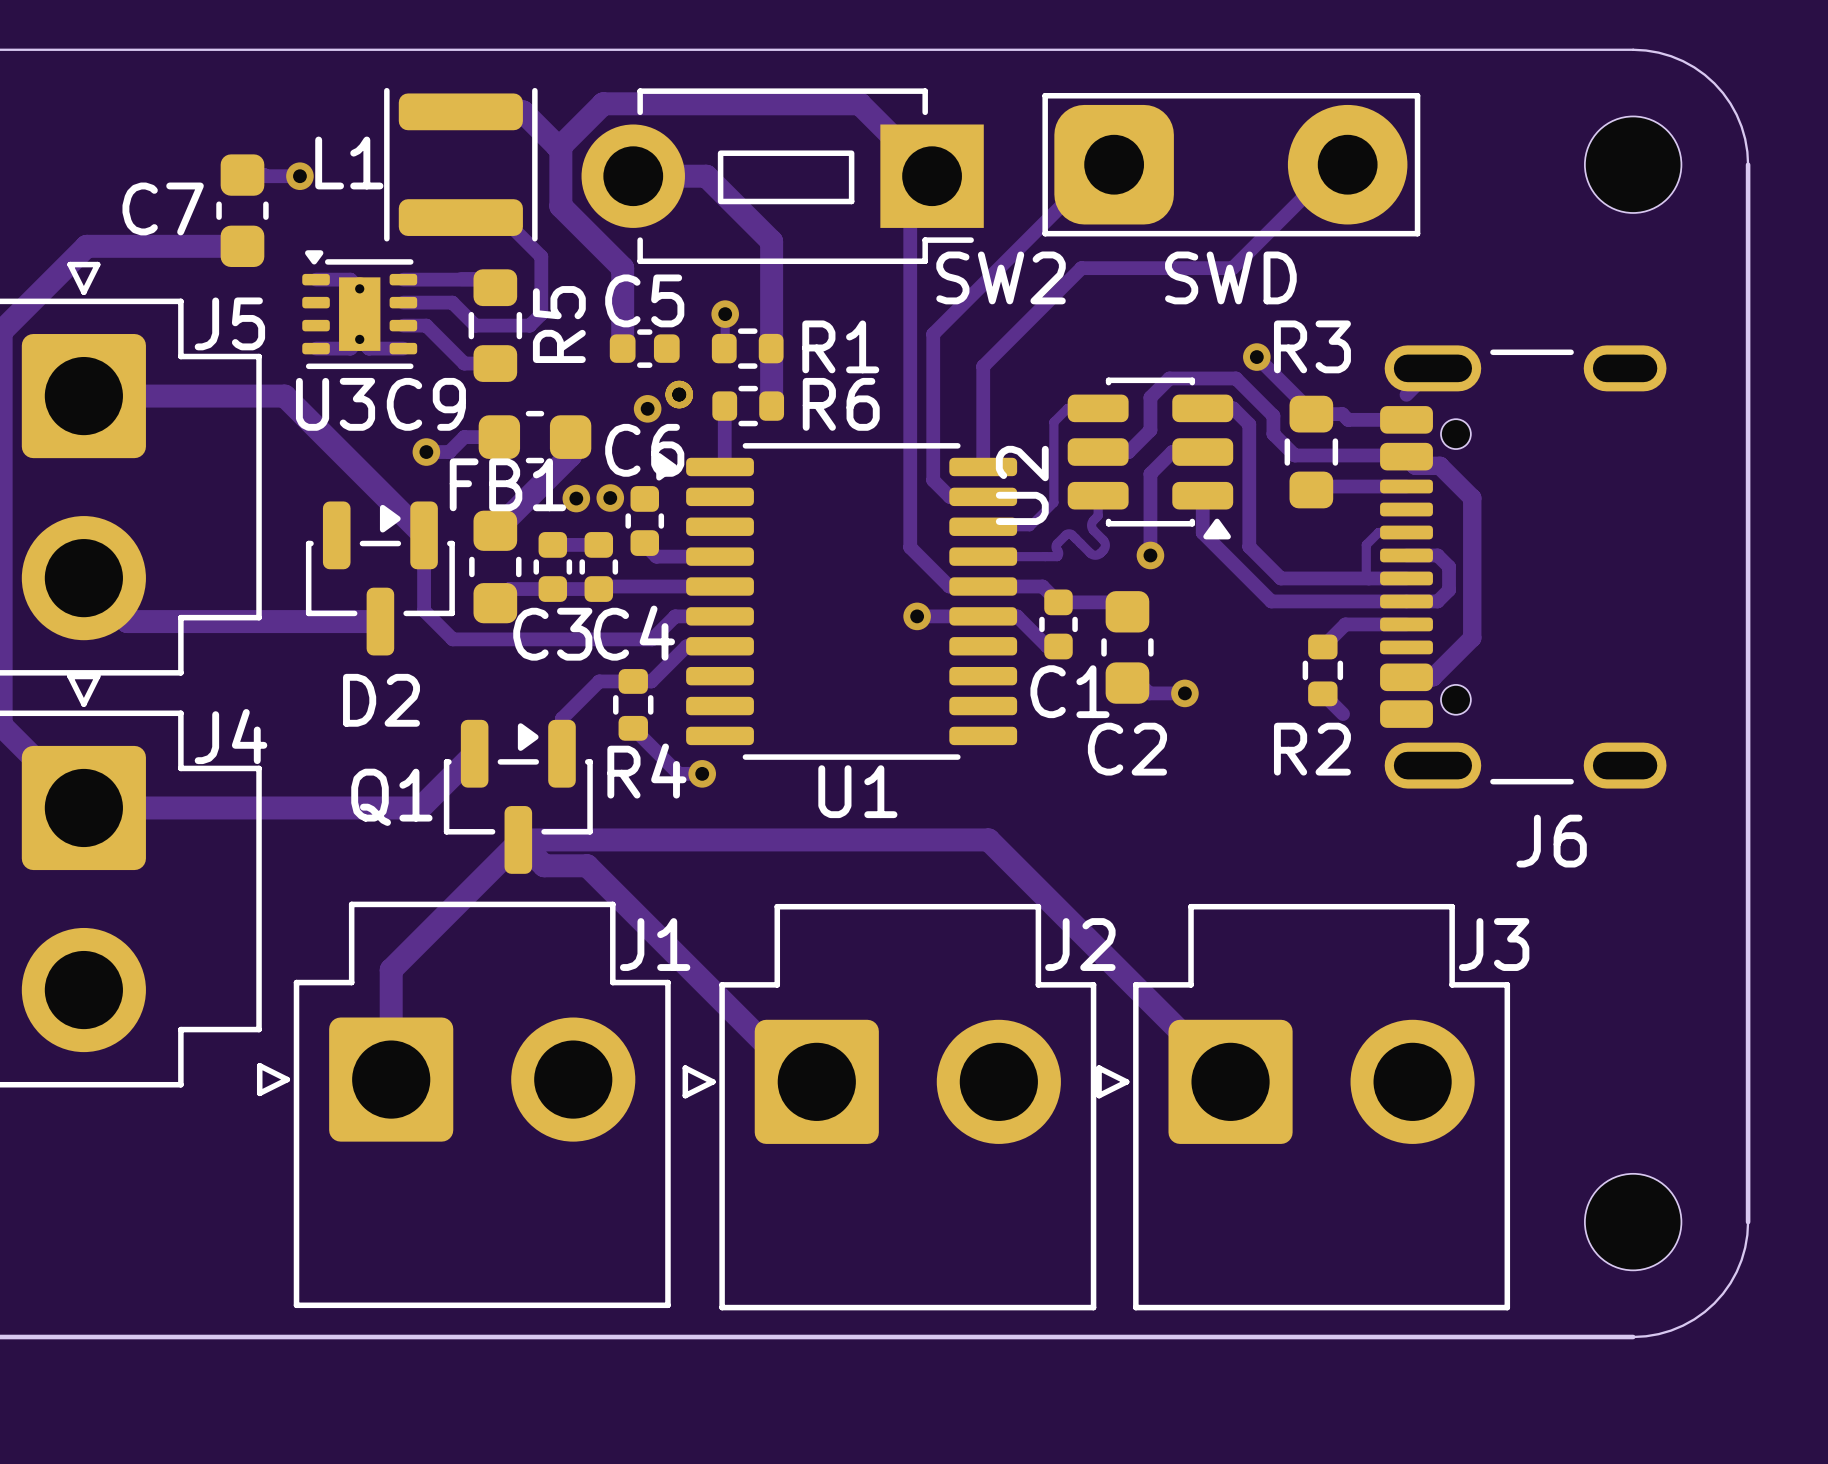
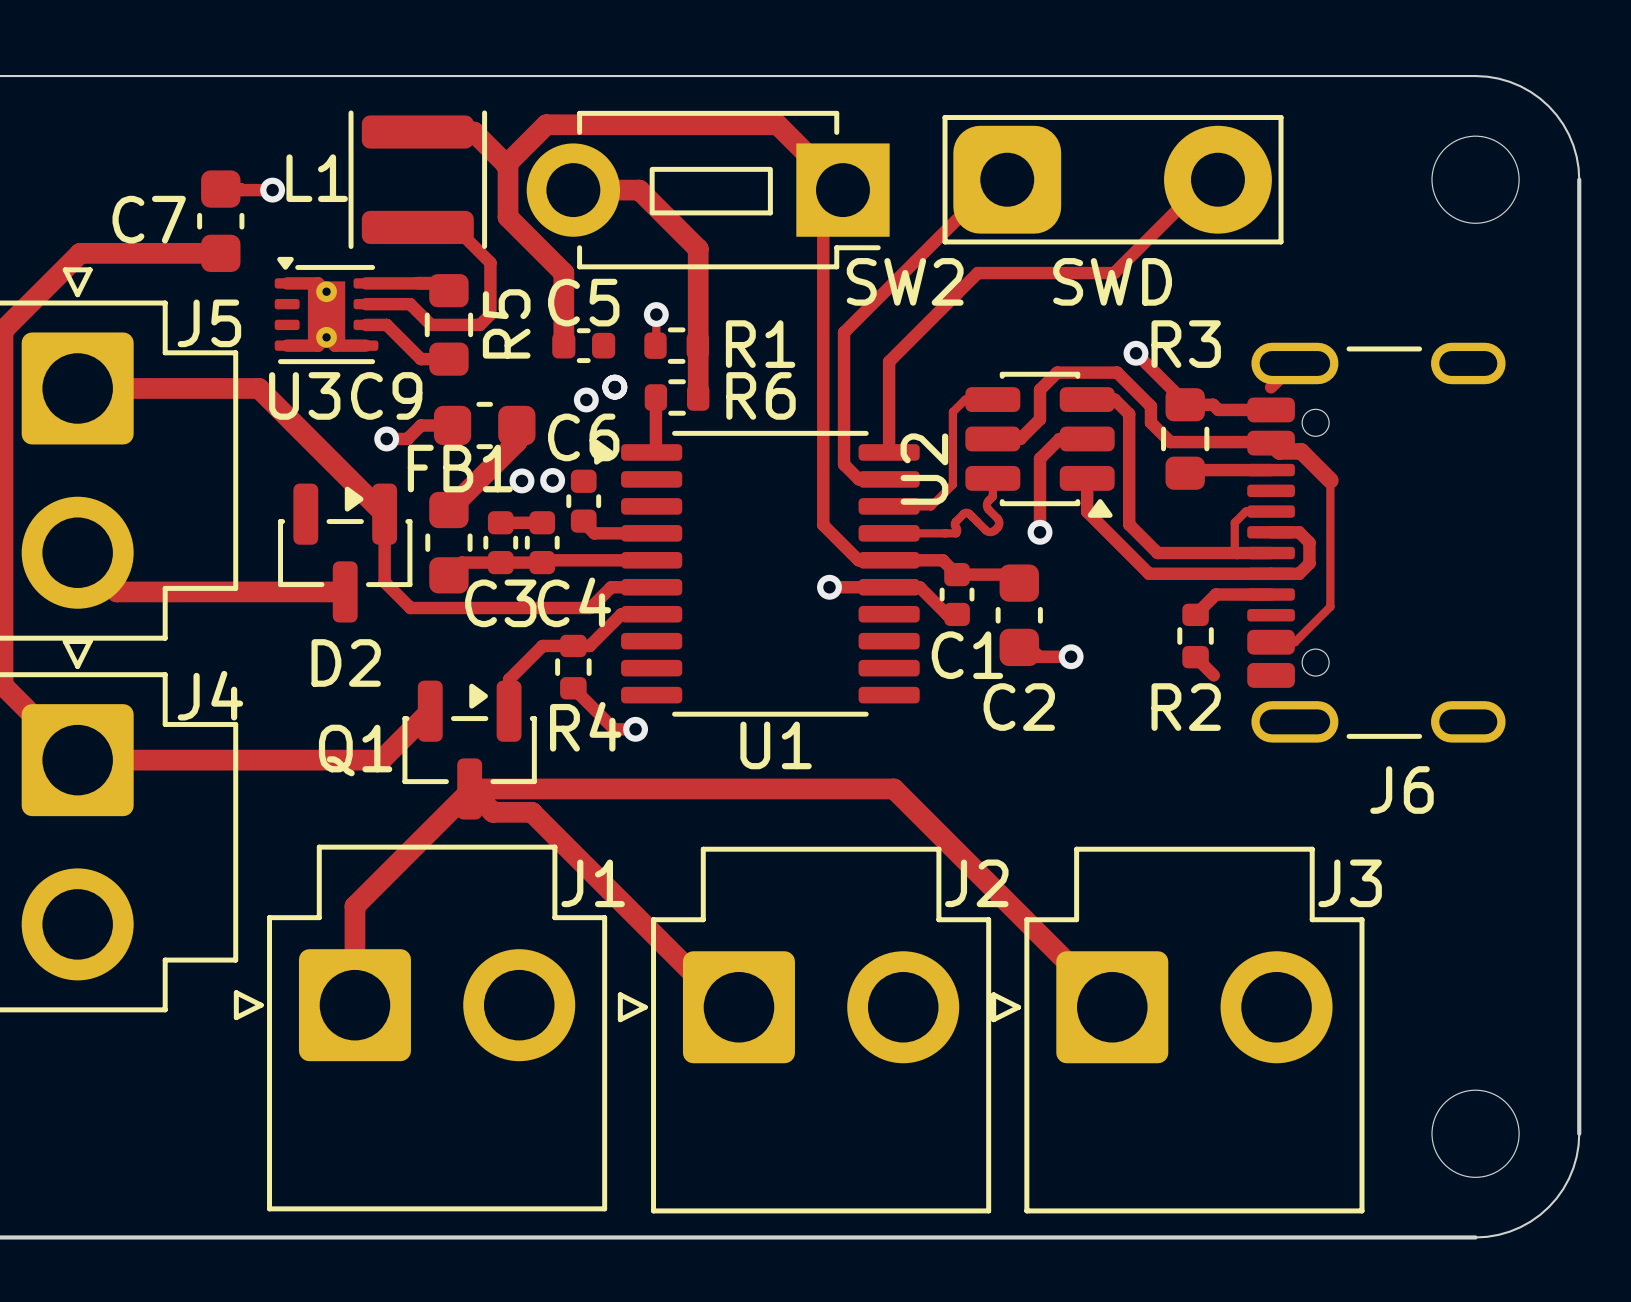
track width: thick (1472, 498) (1472, 638) (1432, 677) (1406, 677) -> thin (1330, 480) (1330, 606) (1294, 642) (1271, 642)

